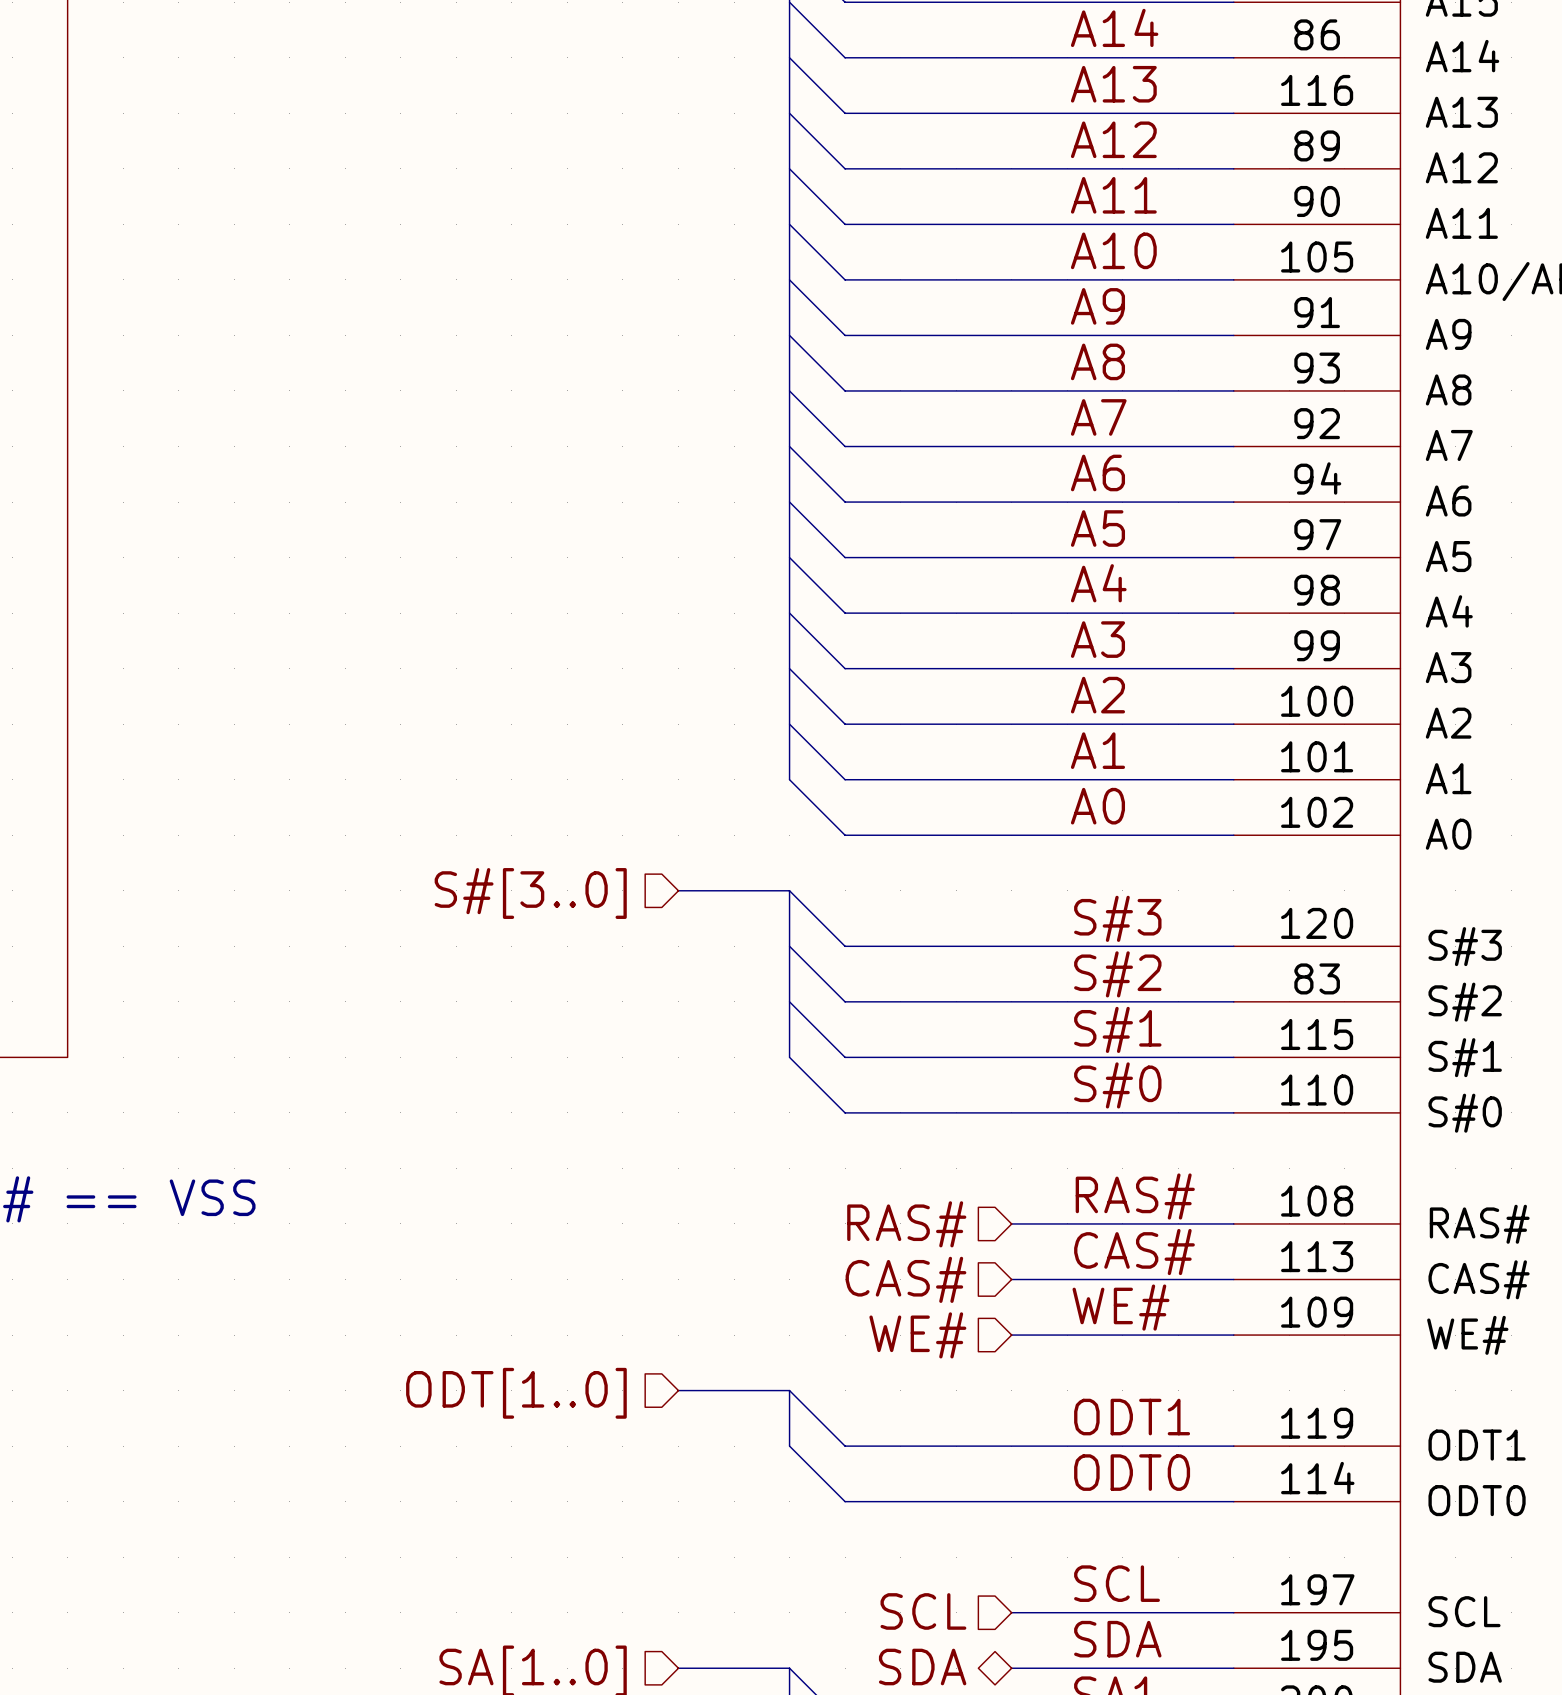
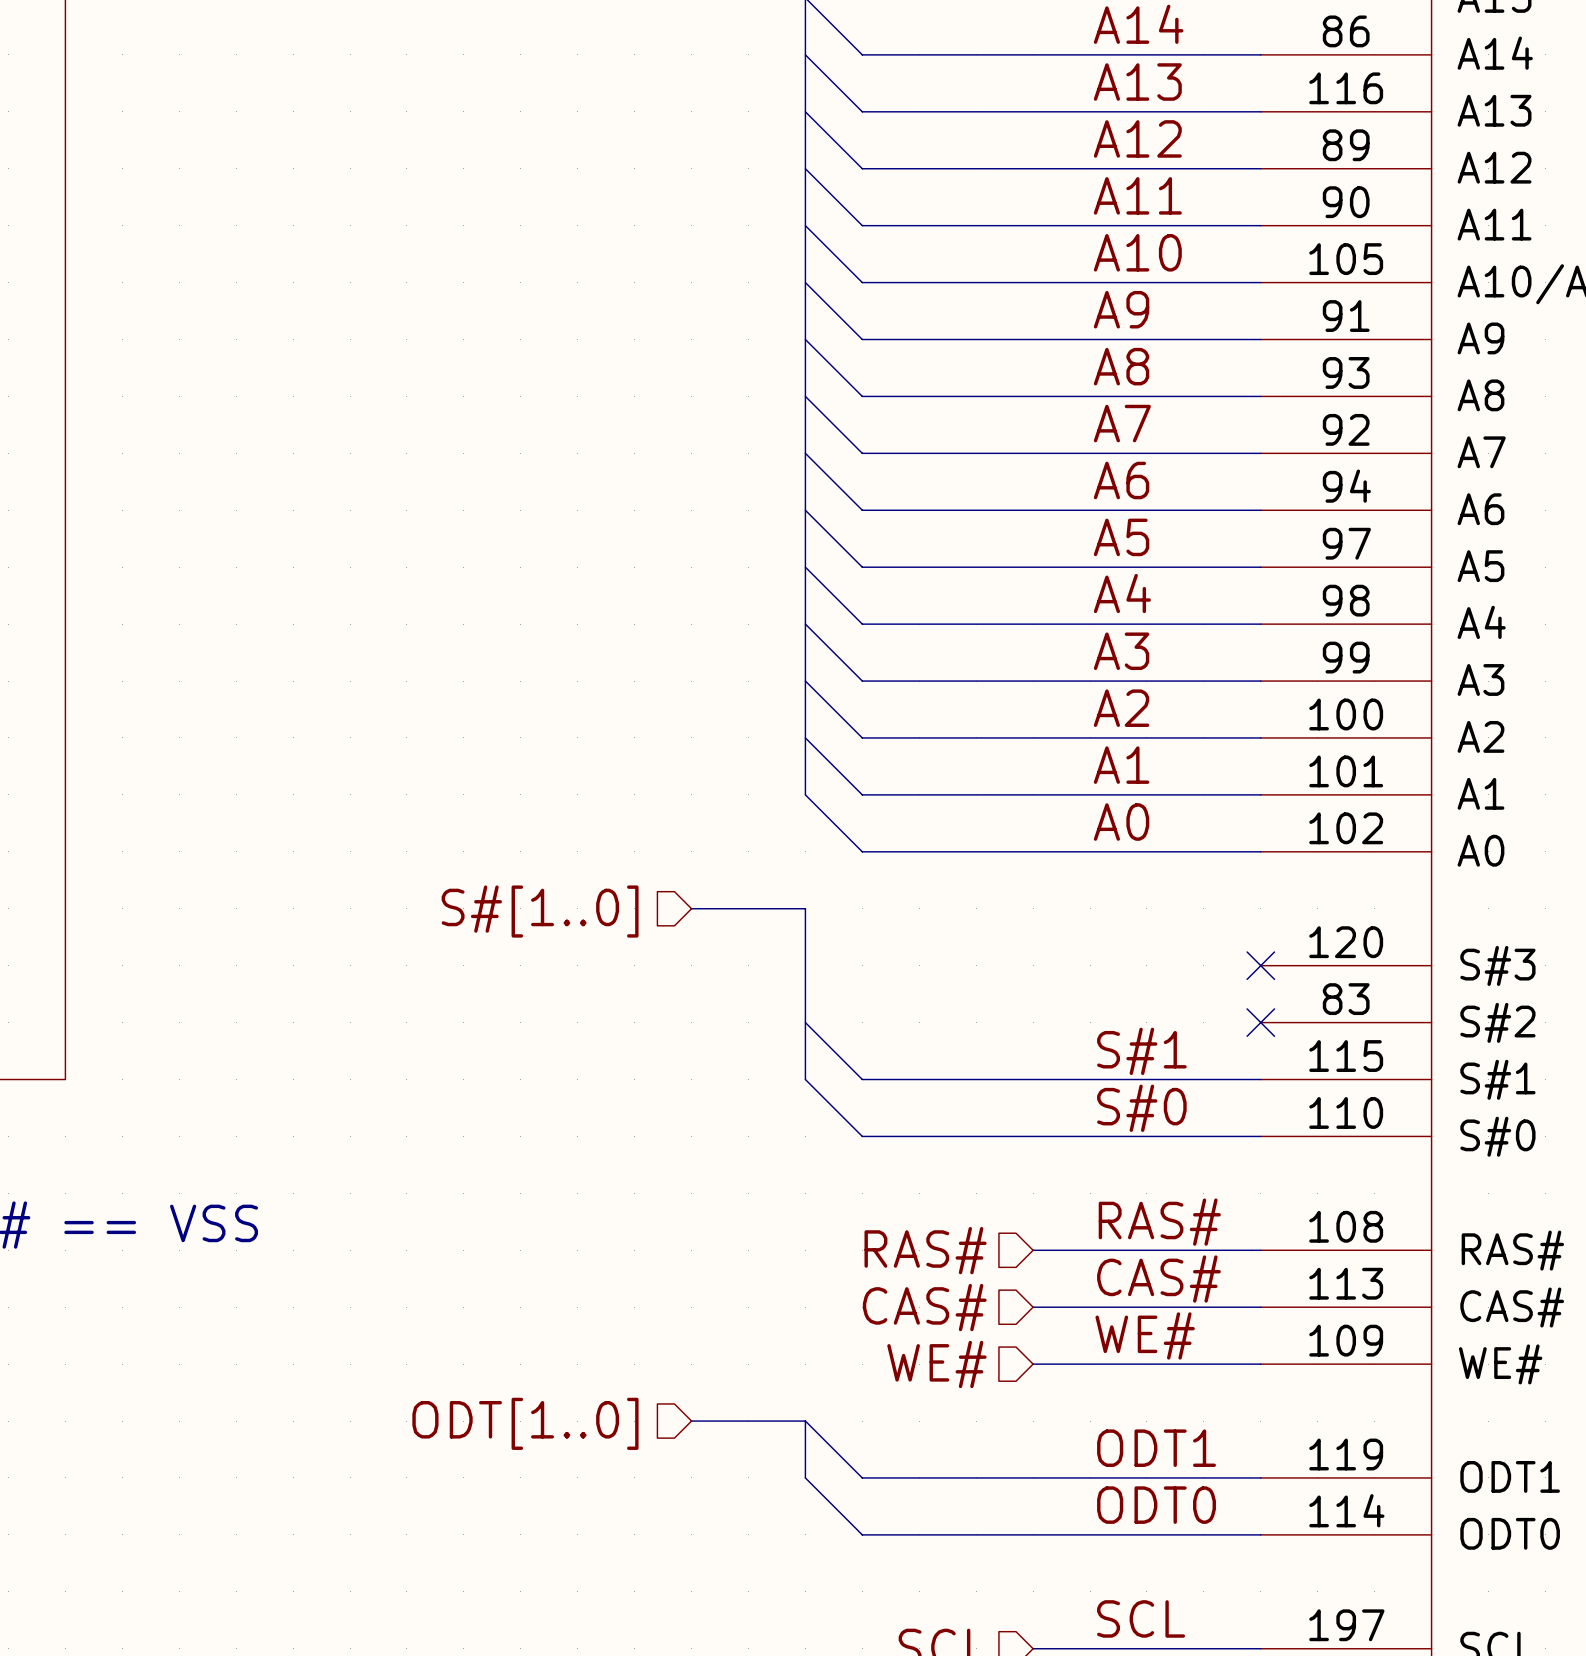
wire: (789, 890) (845, 946) (1233, 946) -> none
hierarchical label: S#[3..0] (530, 893) -> S#[1..0] (540, 911)
label: S#3 (1117, 918) -> none
wire: (789, 946) (845, 1001) (1233, 1001) -> none
no-connect mark: none -> (1260, 965)
label: S#2 (1117, 974) -> none
no-connect mark: none -> (1260, 1022)

